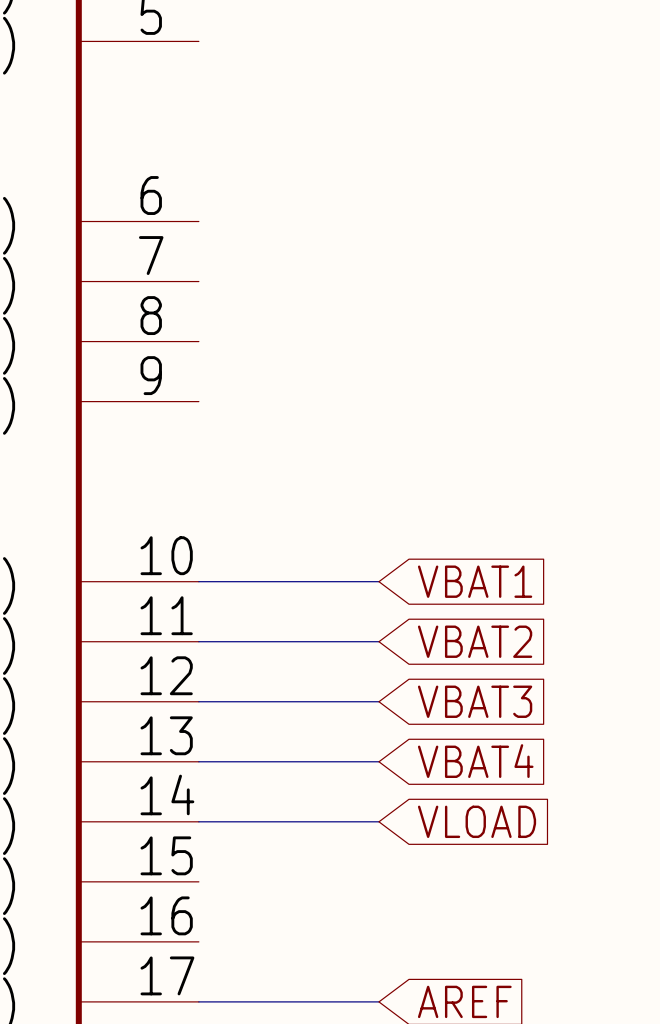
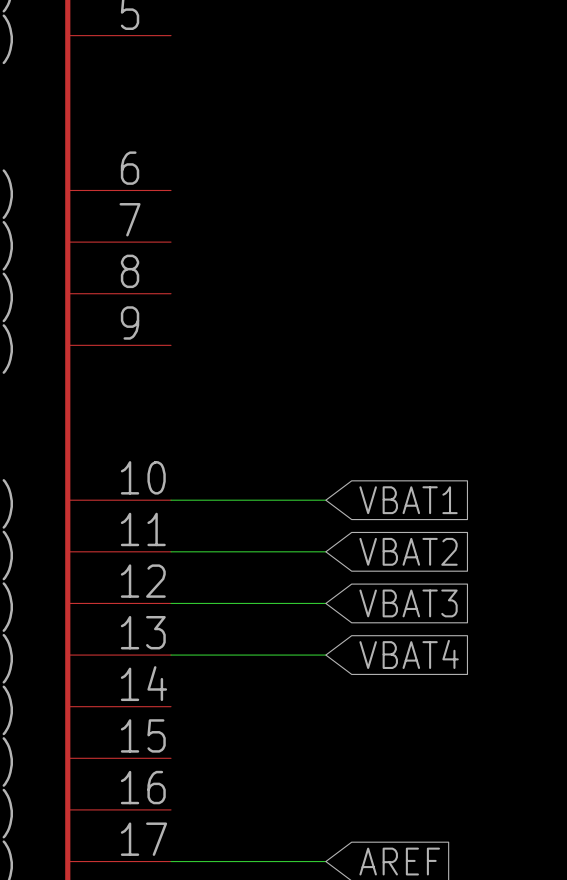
wire: (198, 821) (378, 821) -> none
global label: VLOAD (477, 821) -> none

